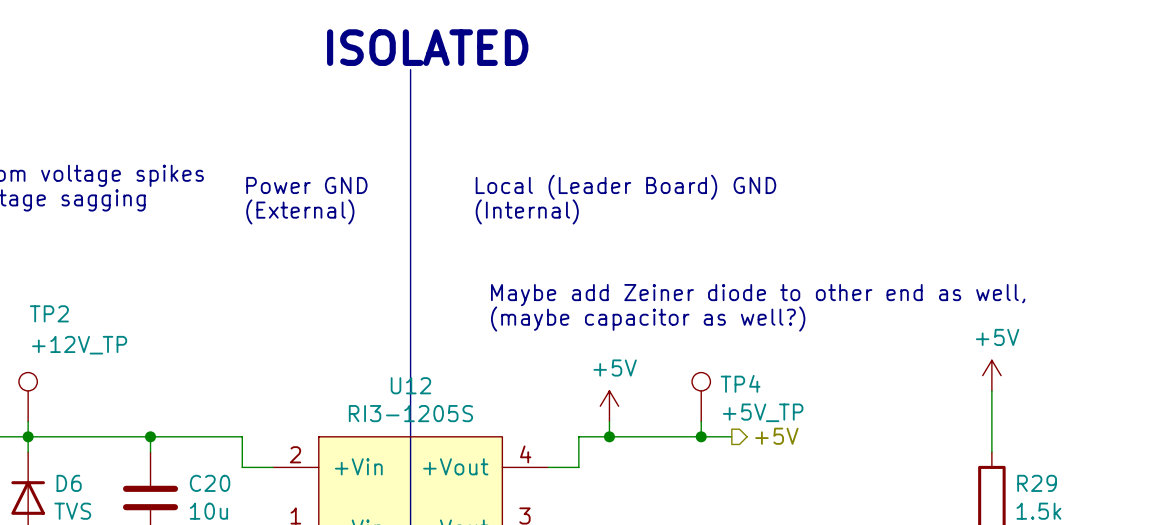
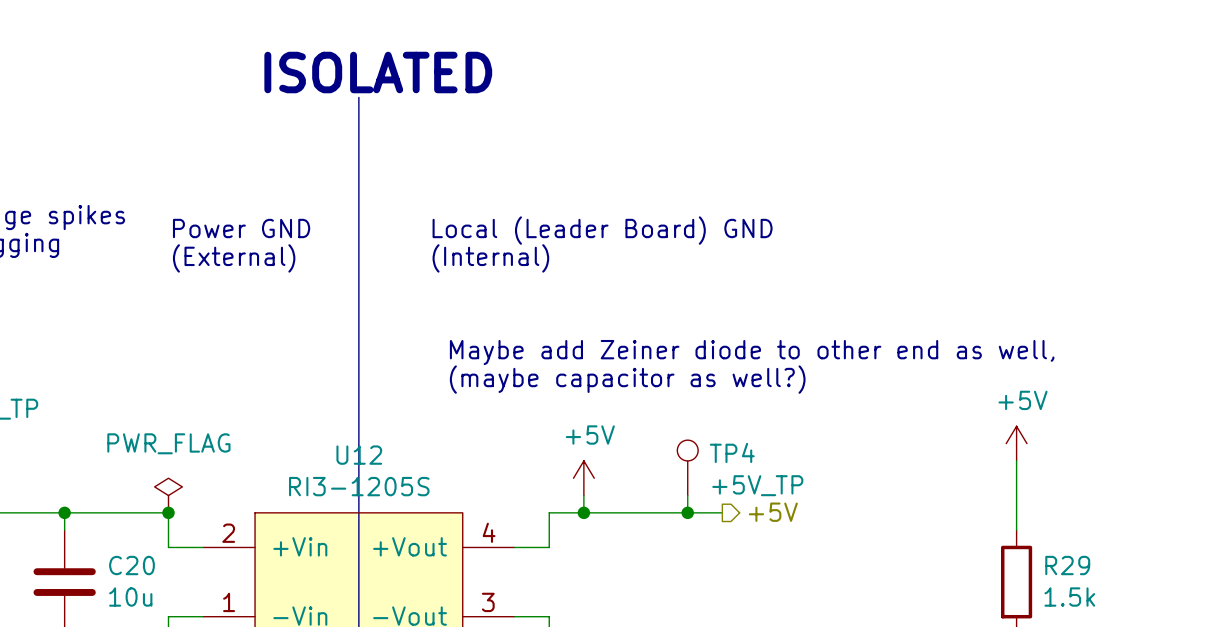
power symbol: none -> PWR_FLAG (168, 495)
junction: none -> (168, 512)

